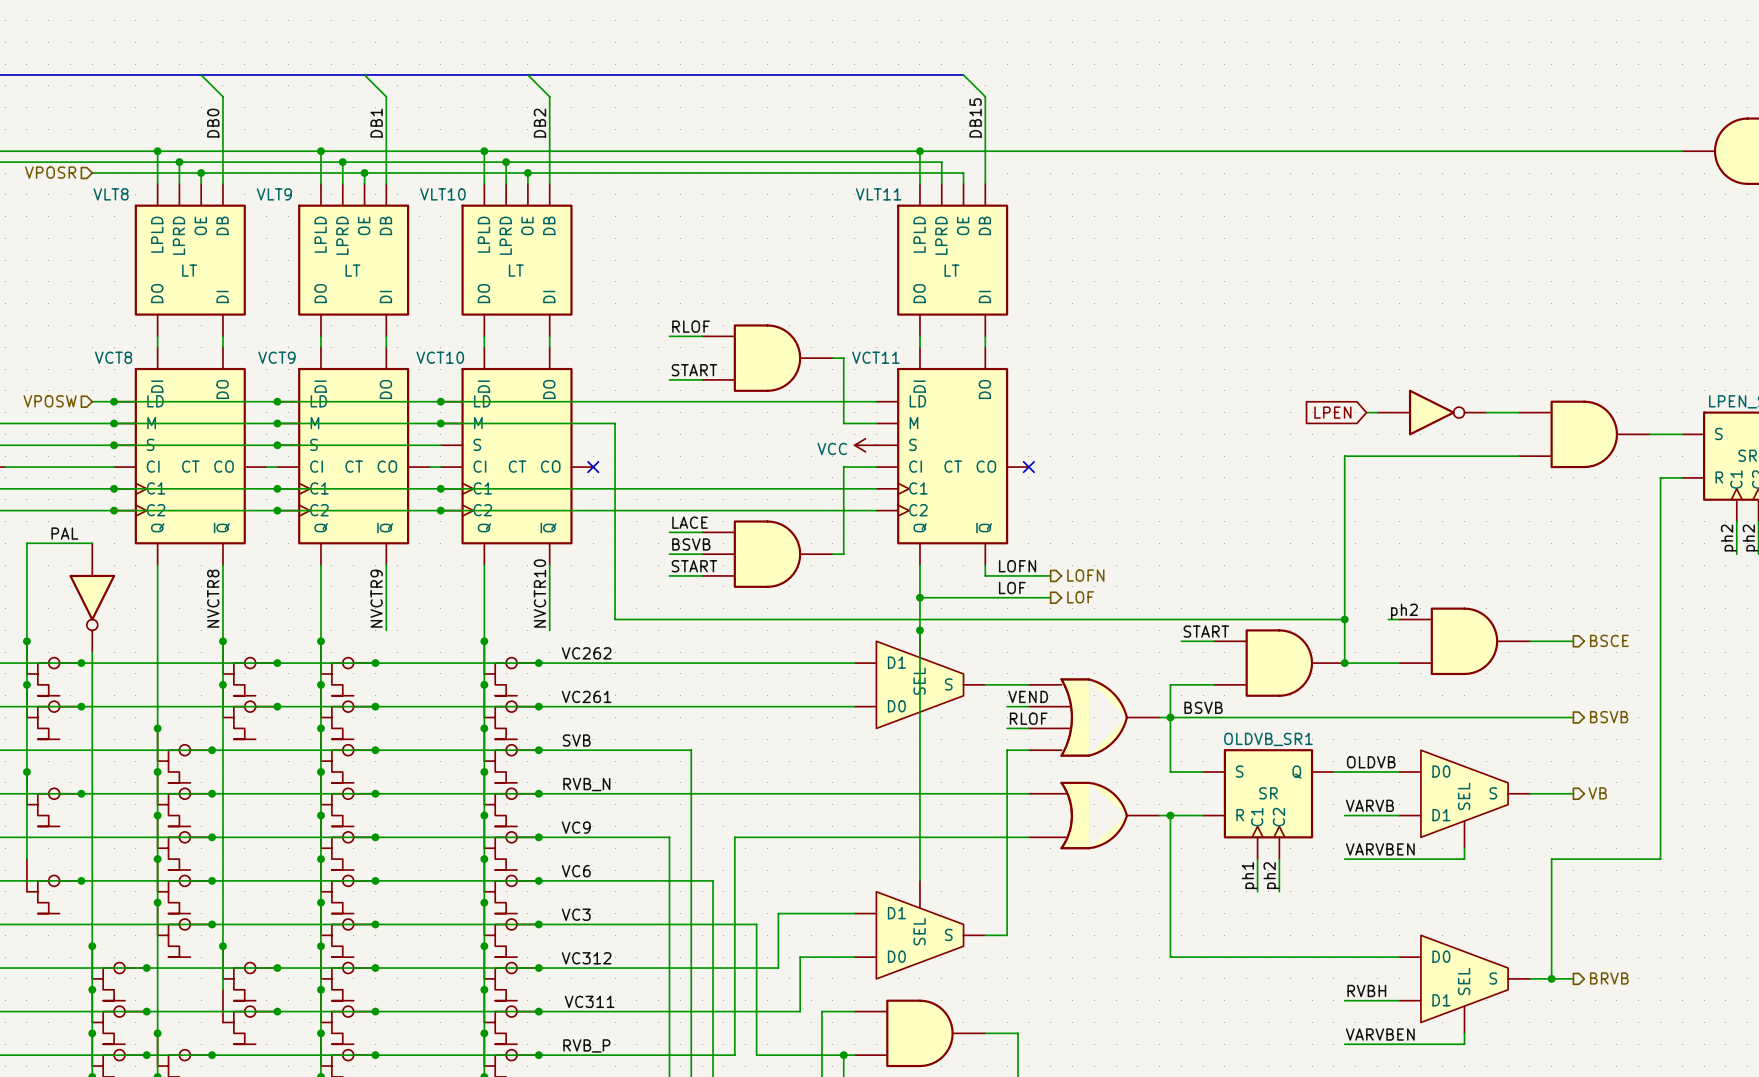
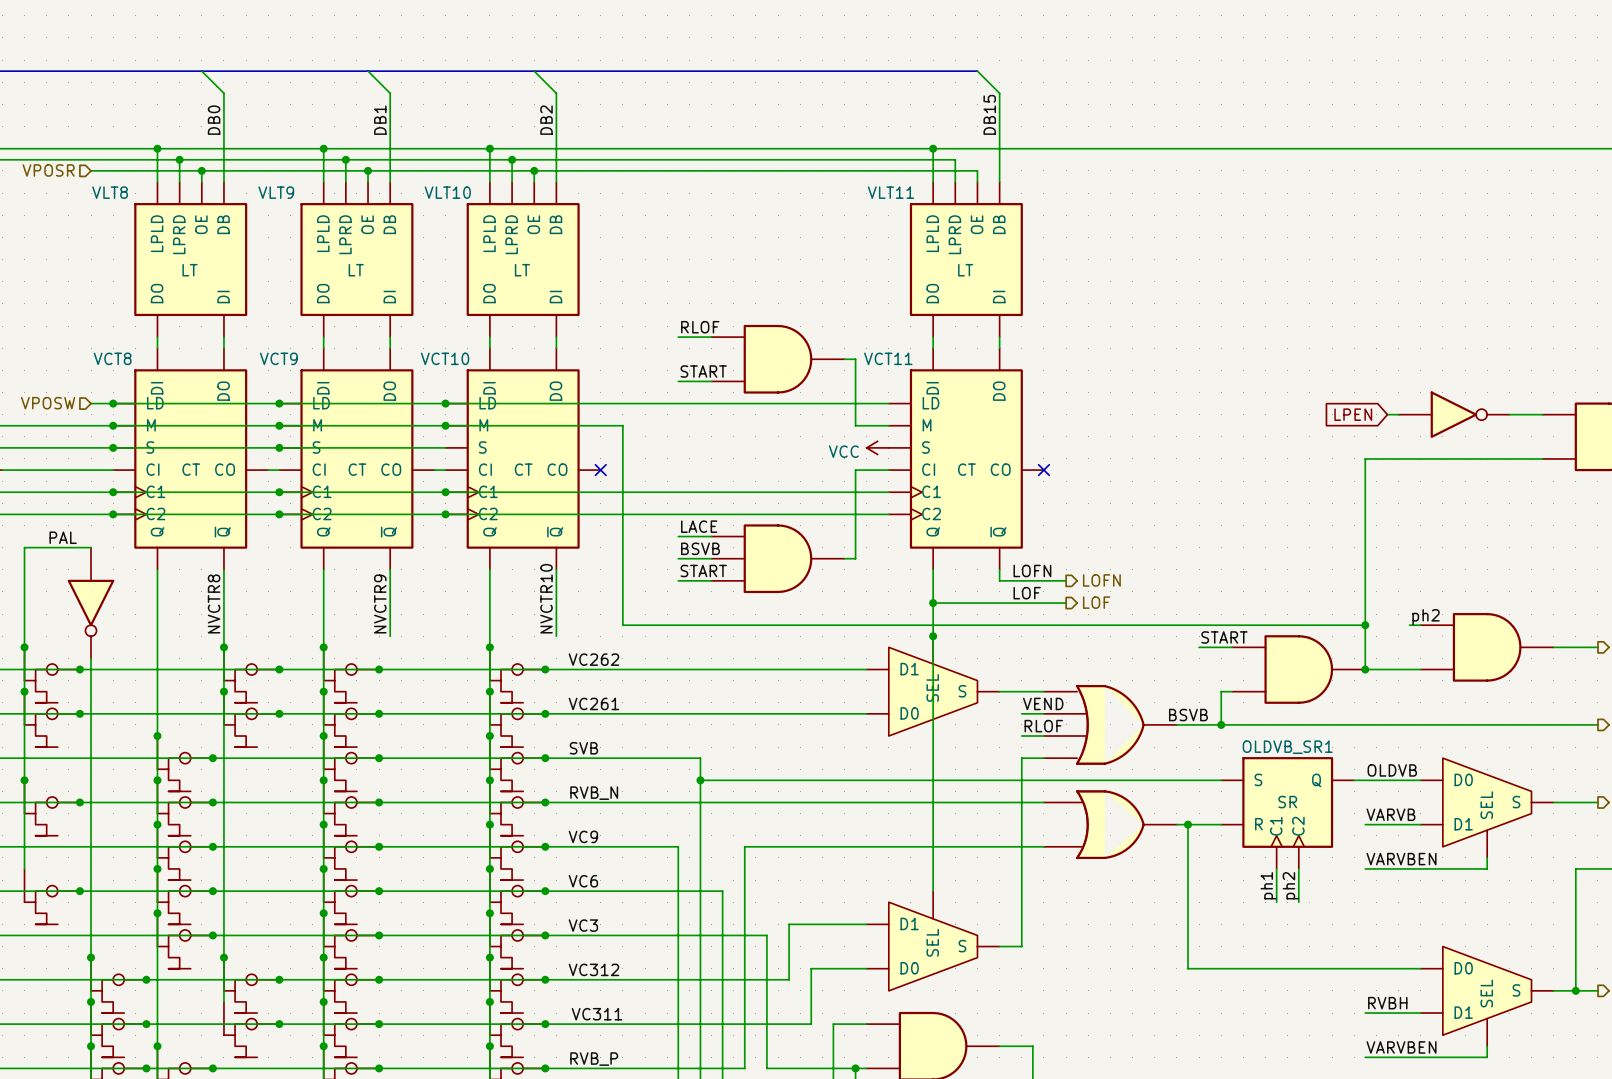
wire: (1203, 684) (1170, 684) (1170, 771) -> (1221, 691) (1221, 724)
label position: BSVB (1203, 707) -> BSVB (1188, 715)
junction position: (1170, 717) -> (1221, 724)
wire: none -> (700, 780) (1187, 780)
junction: none -> (700, 780)

